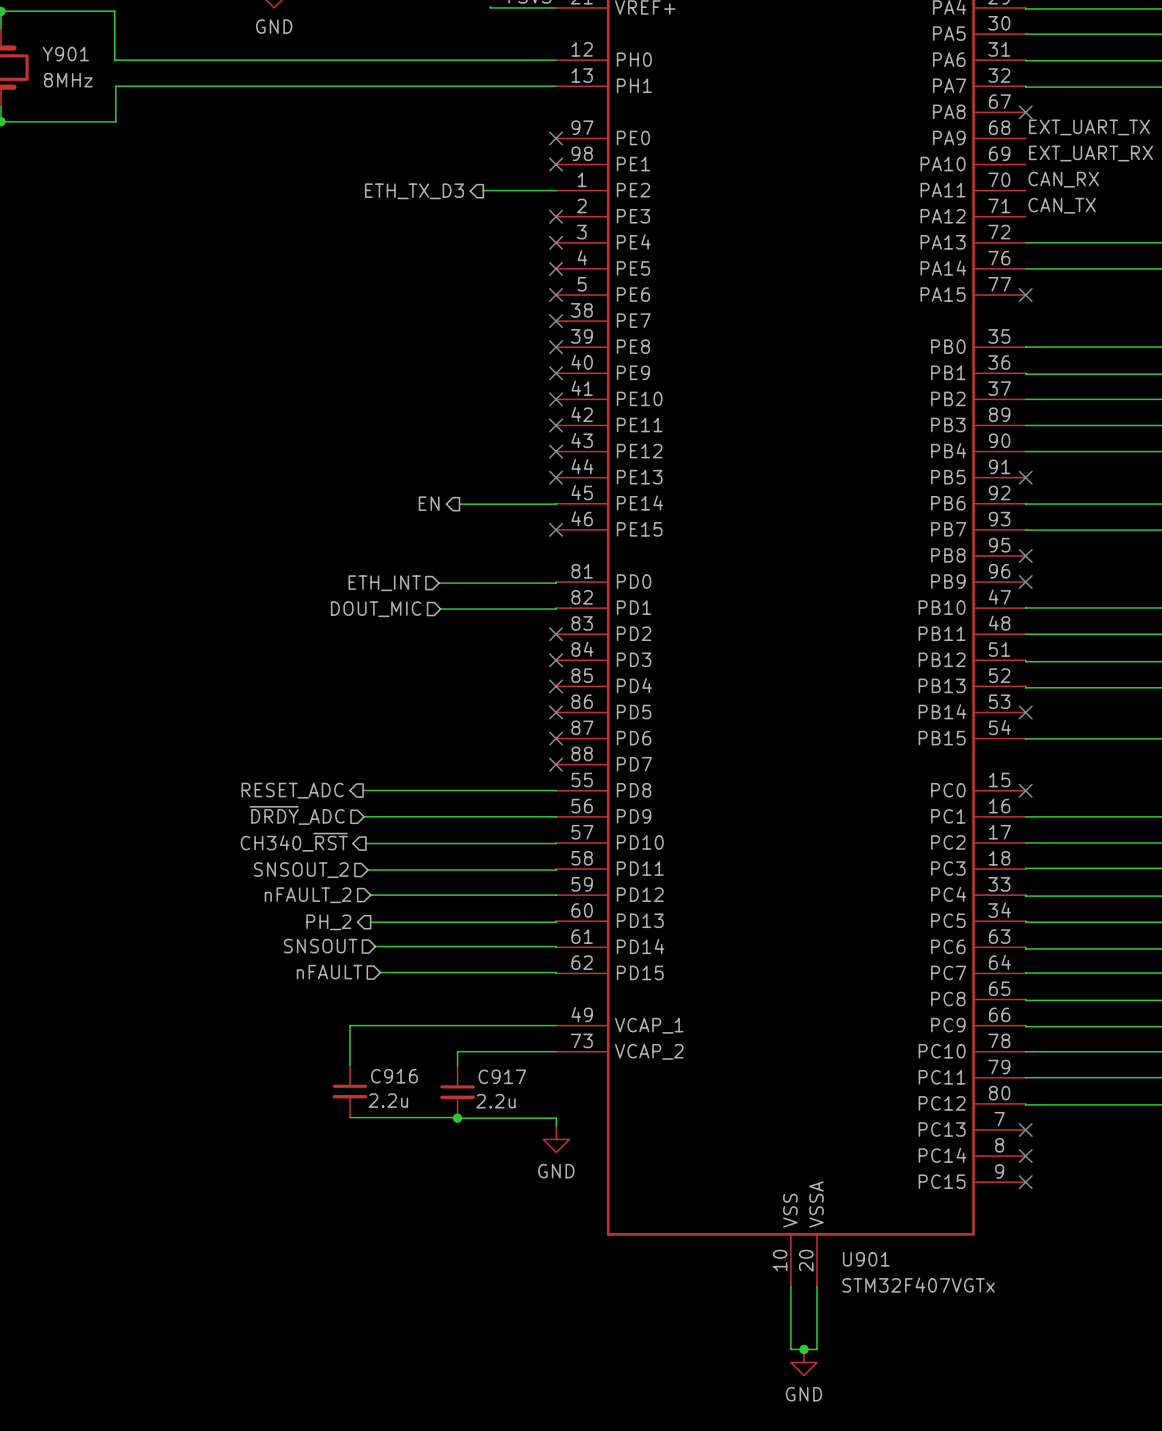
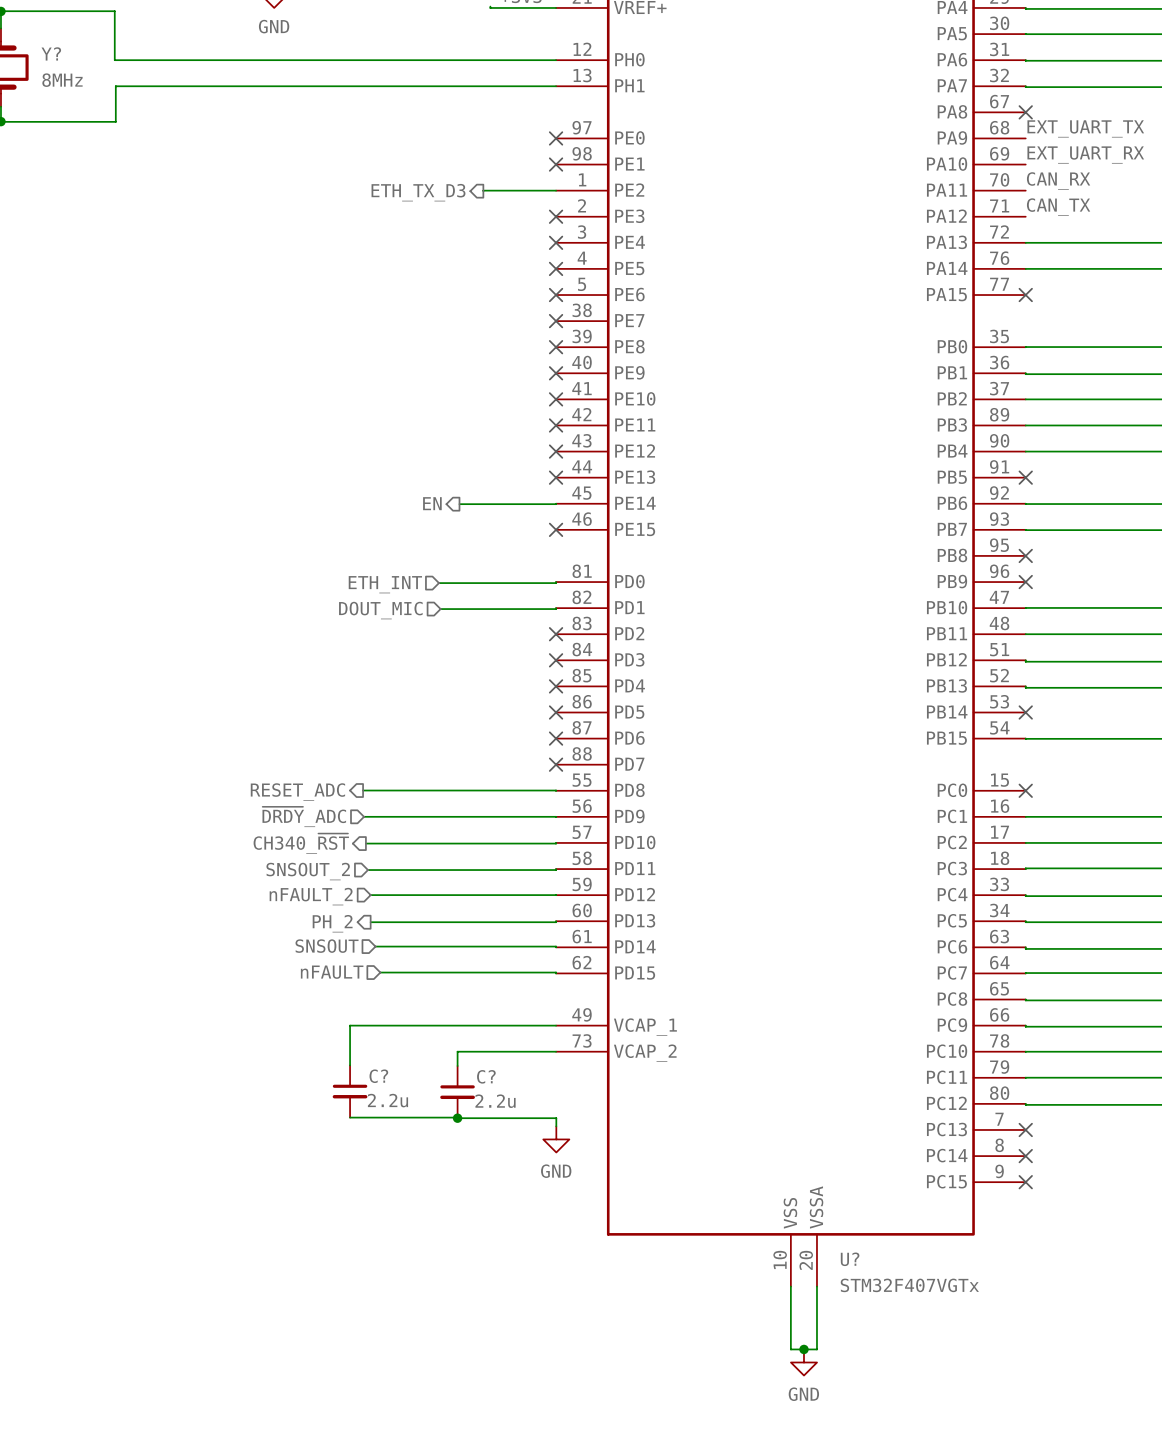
Y901 name: Y901 (65, 54) -> Y? (51, 53)
C916 name: C916 (394, 1076) -> C? (378, 1076)
C917 name: C917 (502, 1076) -> C? (486, 1076)
U901 name: U901 (866, 1259) -> U? (850, 1259)

